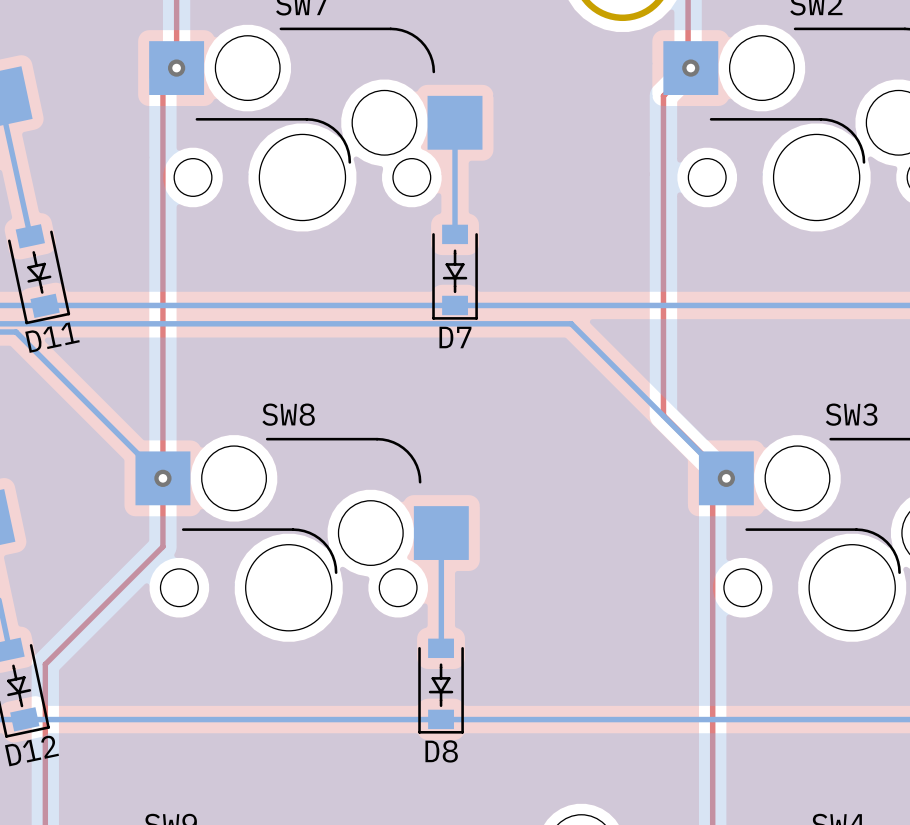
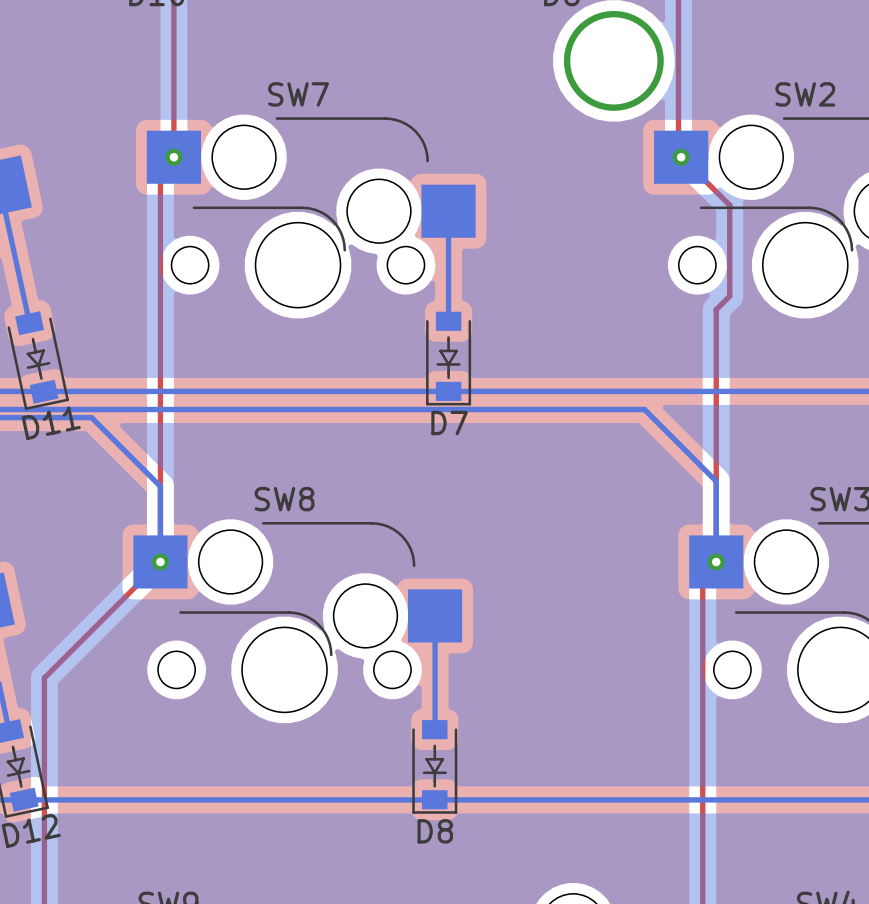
top track: (691, 68) (663, 95) (663, 415) (726, 478) -> (681, 157) (729, 205) (729, 296) (716, 309) (716, 561)
bottom track: (571, 323) (726, 478) -> (563, 409) (644, 409) (716, 481) (716, 561)
bottom track: (16, 332) (162, 478) -> (15, 417) (91, 417) (160, 486) (160, 561)
top track: (162, 478) (162, 546) (45, 664) -> (160, 561) (44, 677) (44, 745)

